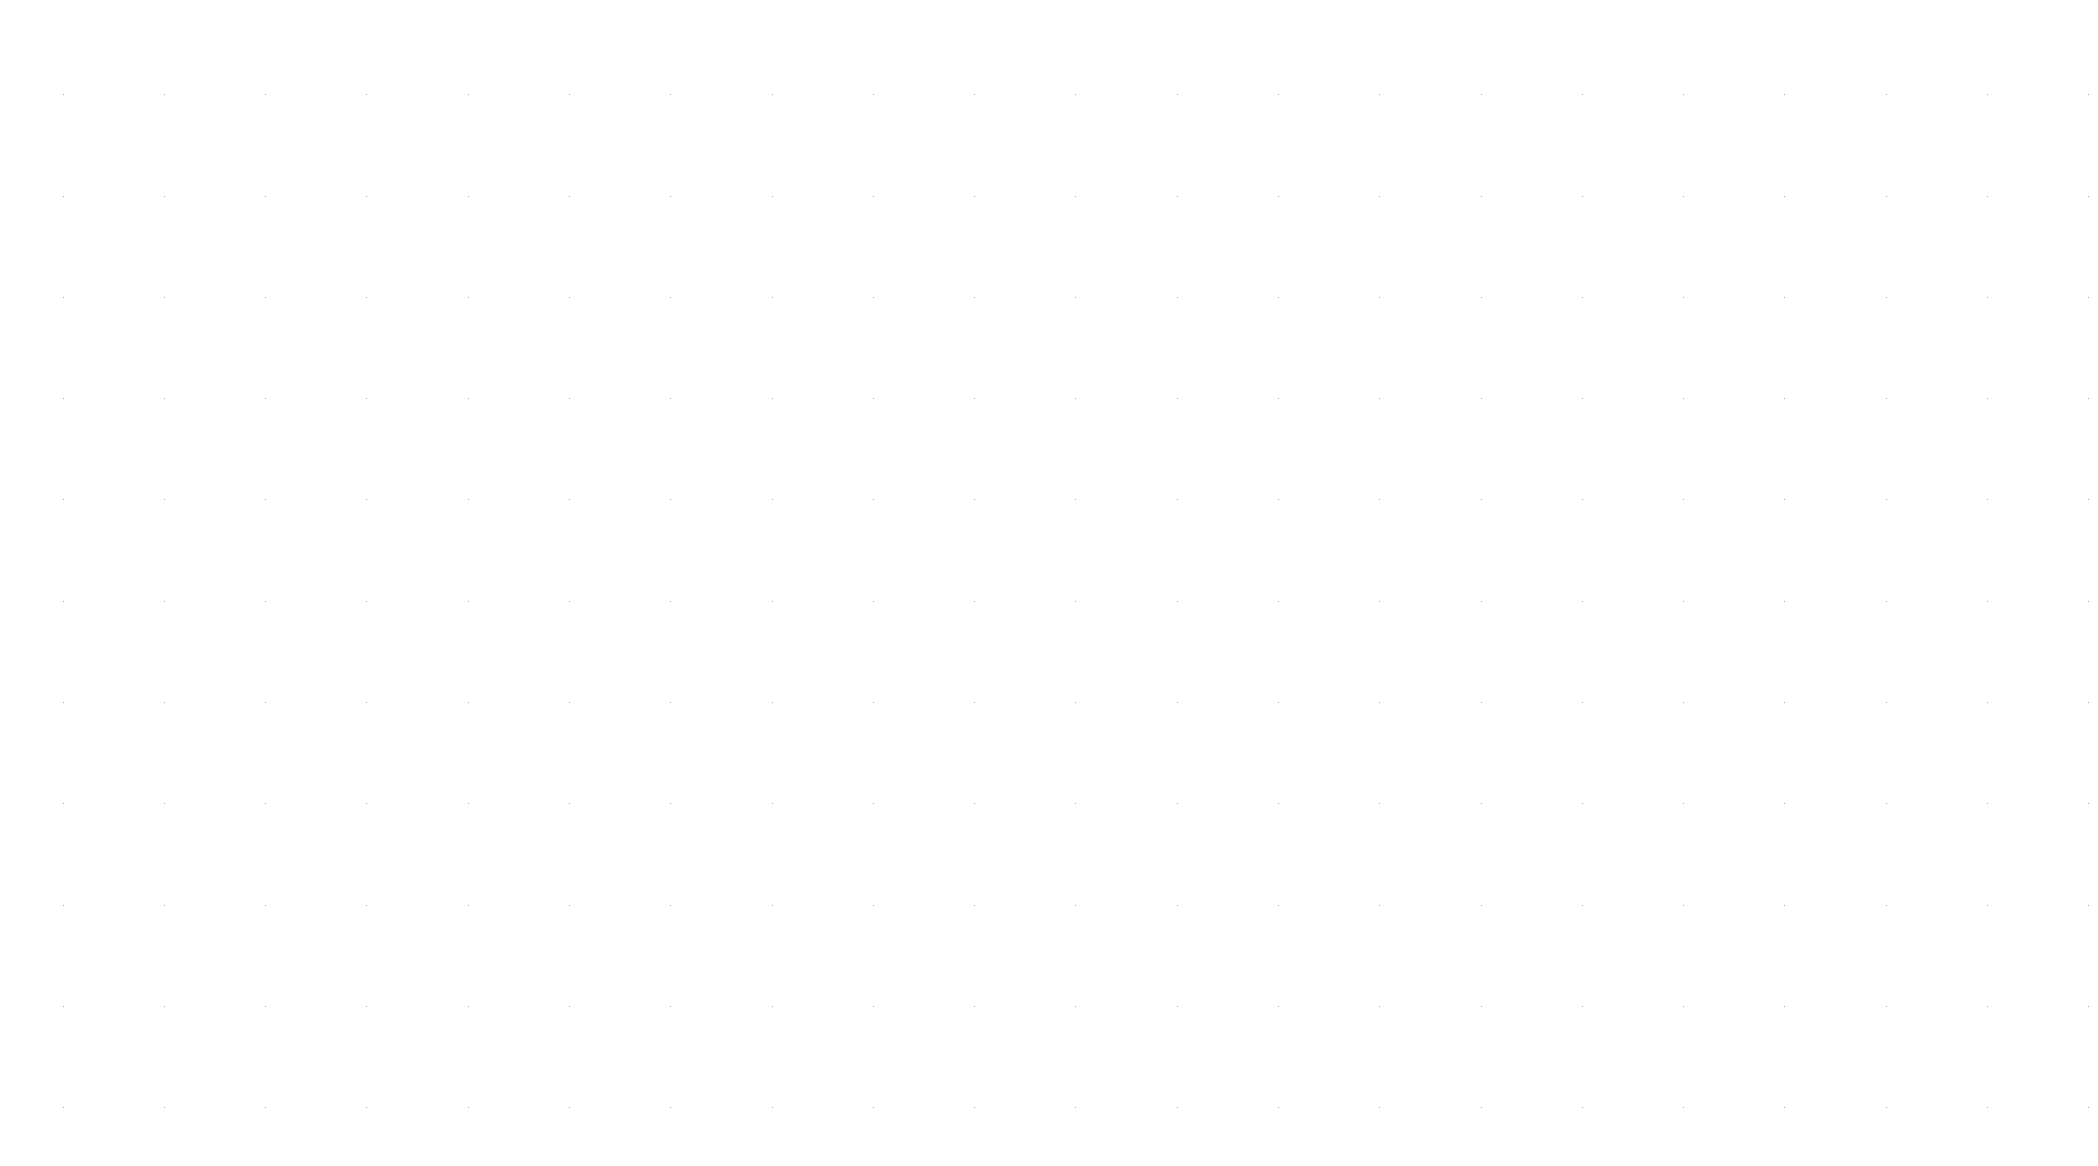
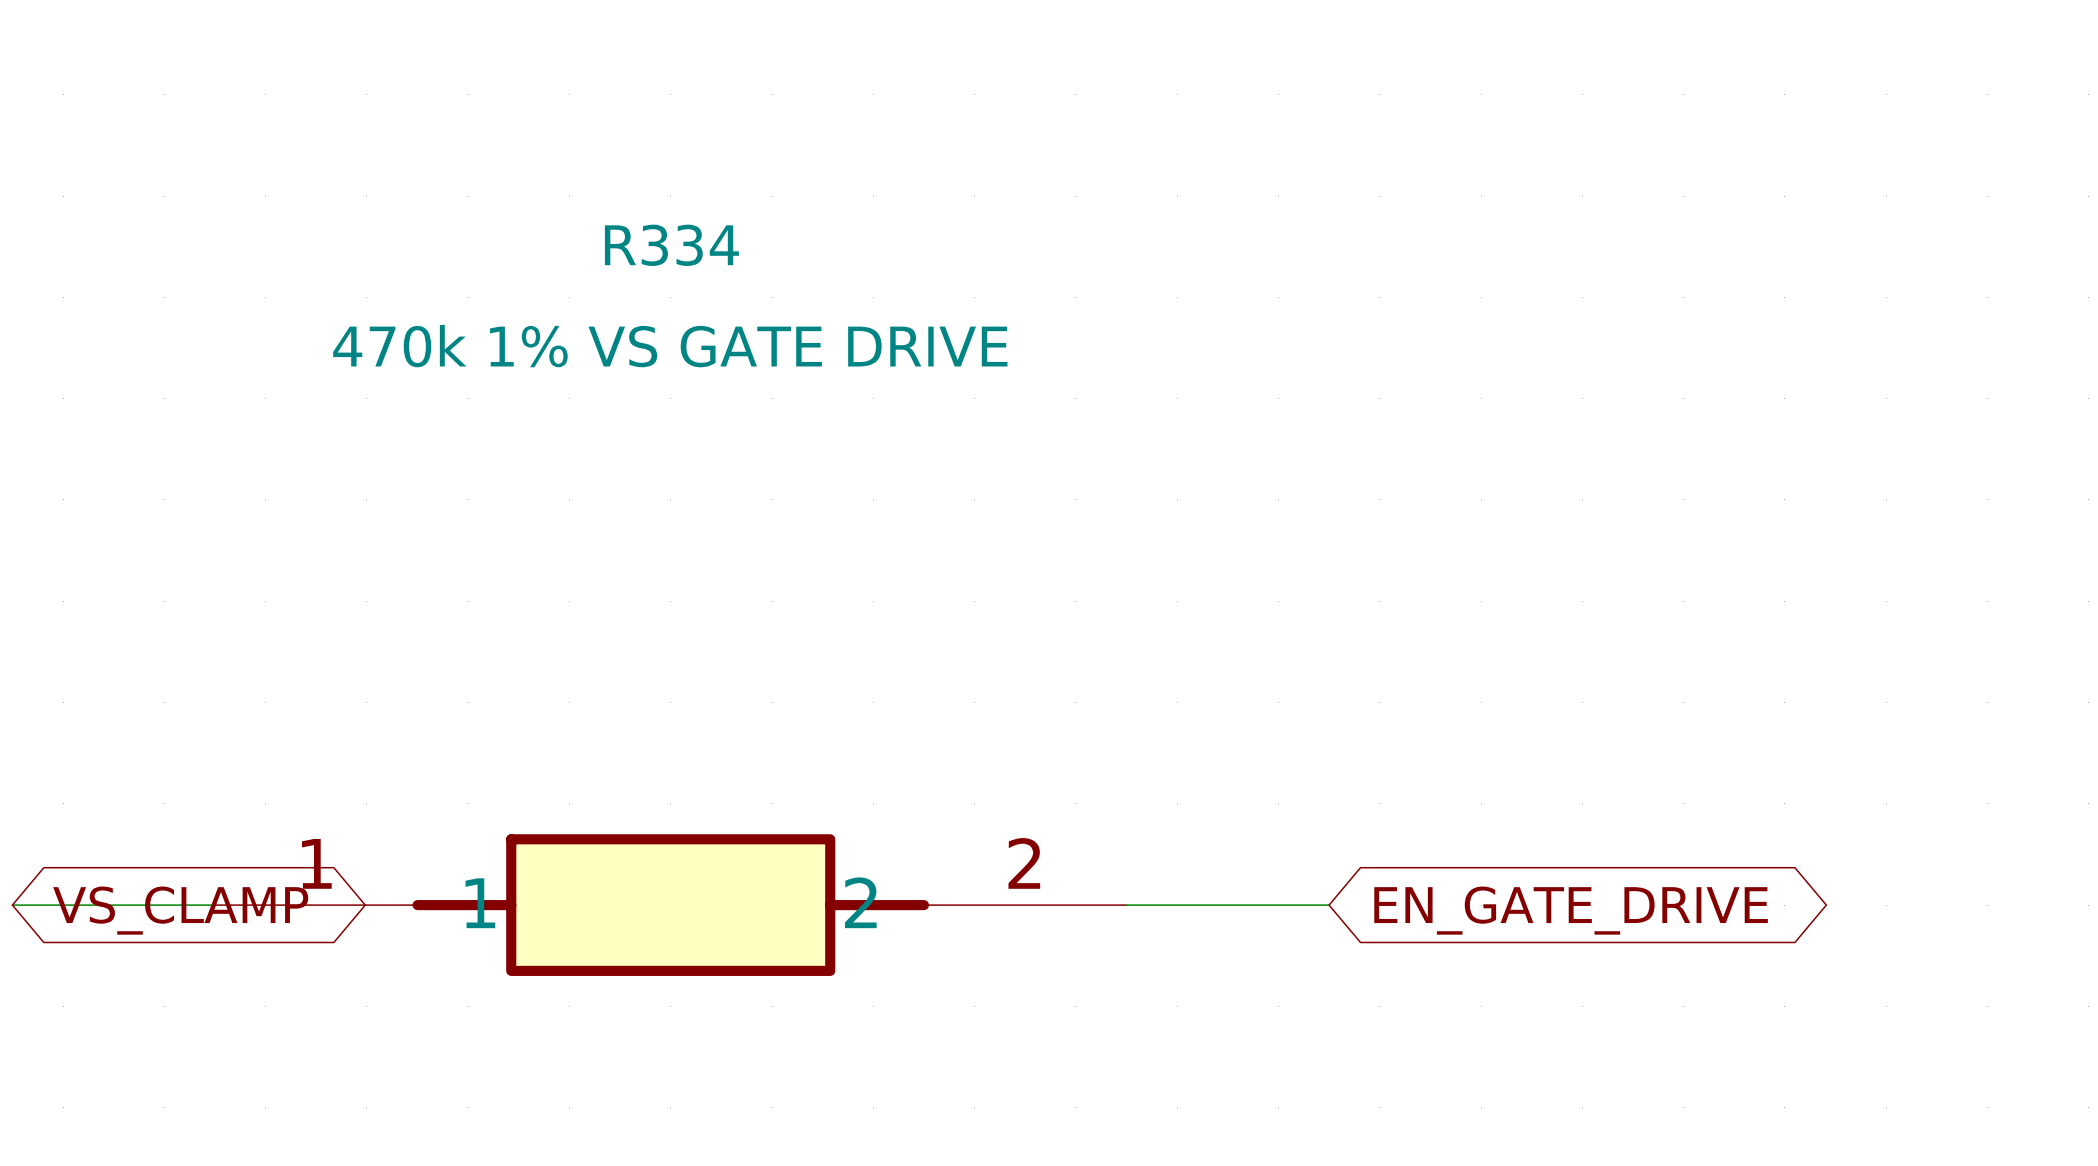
wire: none -> (12, 905) (214, 905)
R334: none -> 470k 1% VS GATE DRIVE (670, 905)
wire: none -> (1126, 905) (1329, 905)
global label: none -> VS_CLAMP (180, 910)
global label: none -> EN_GATE_DRIVE (1571, 910)

